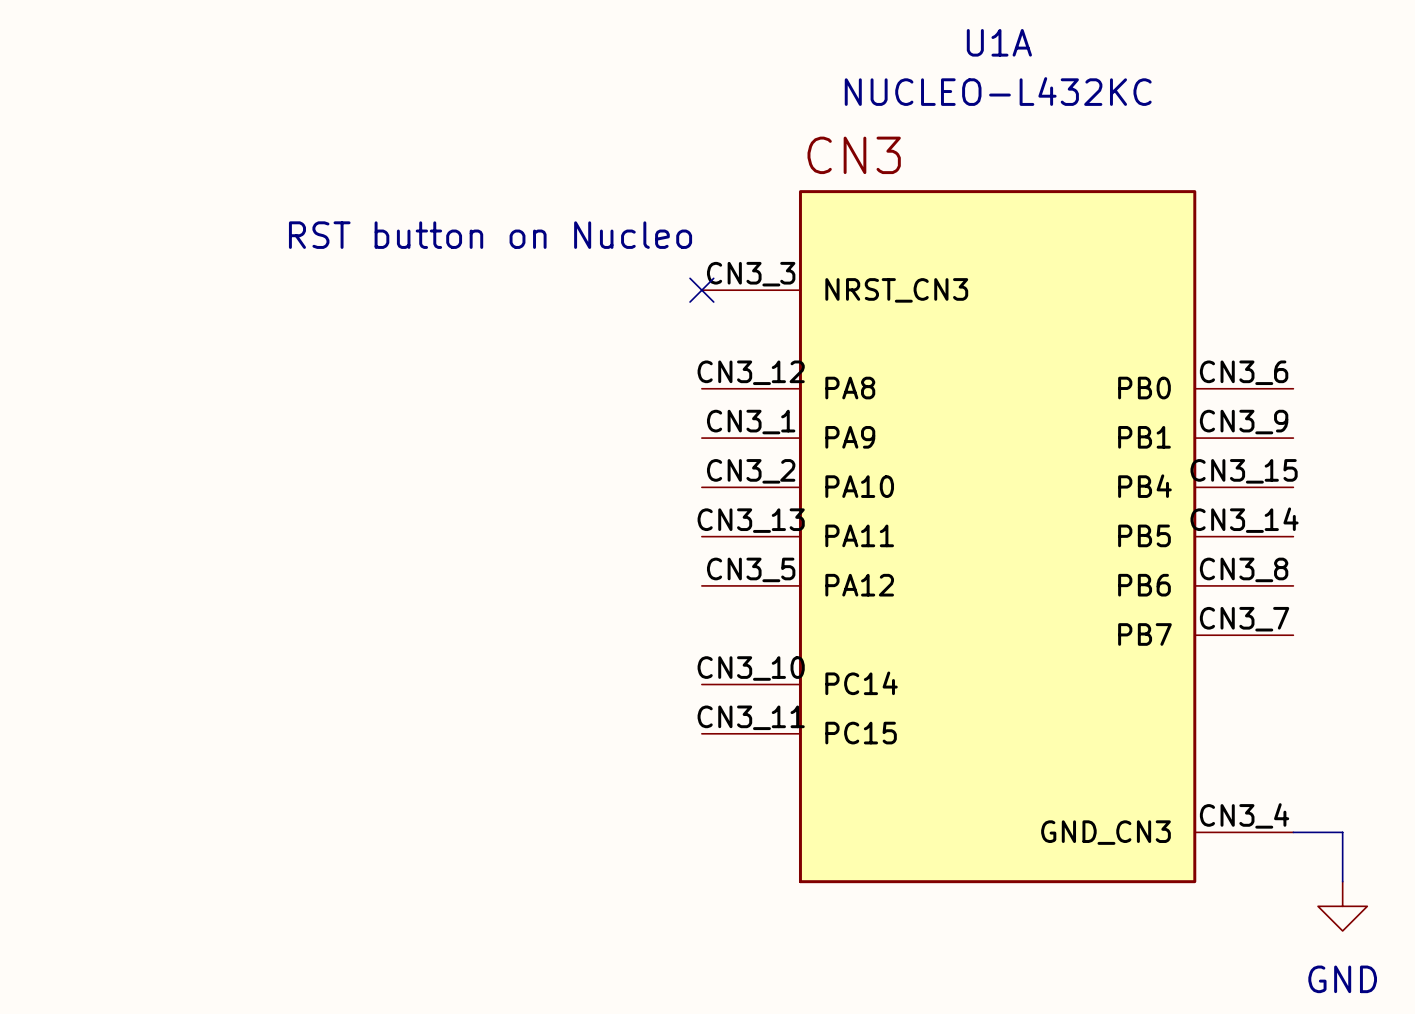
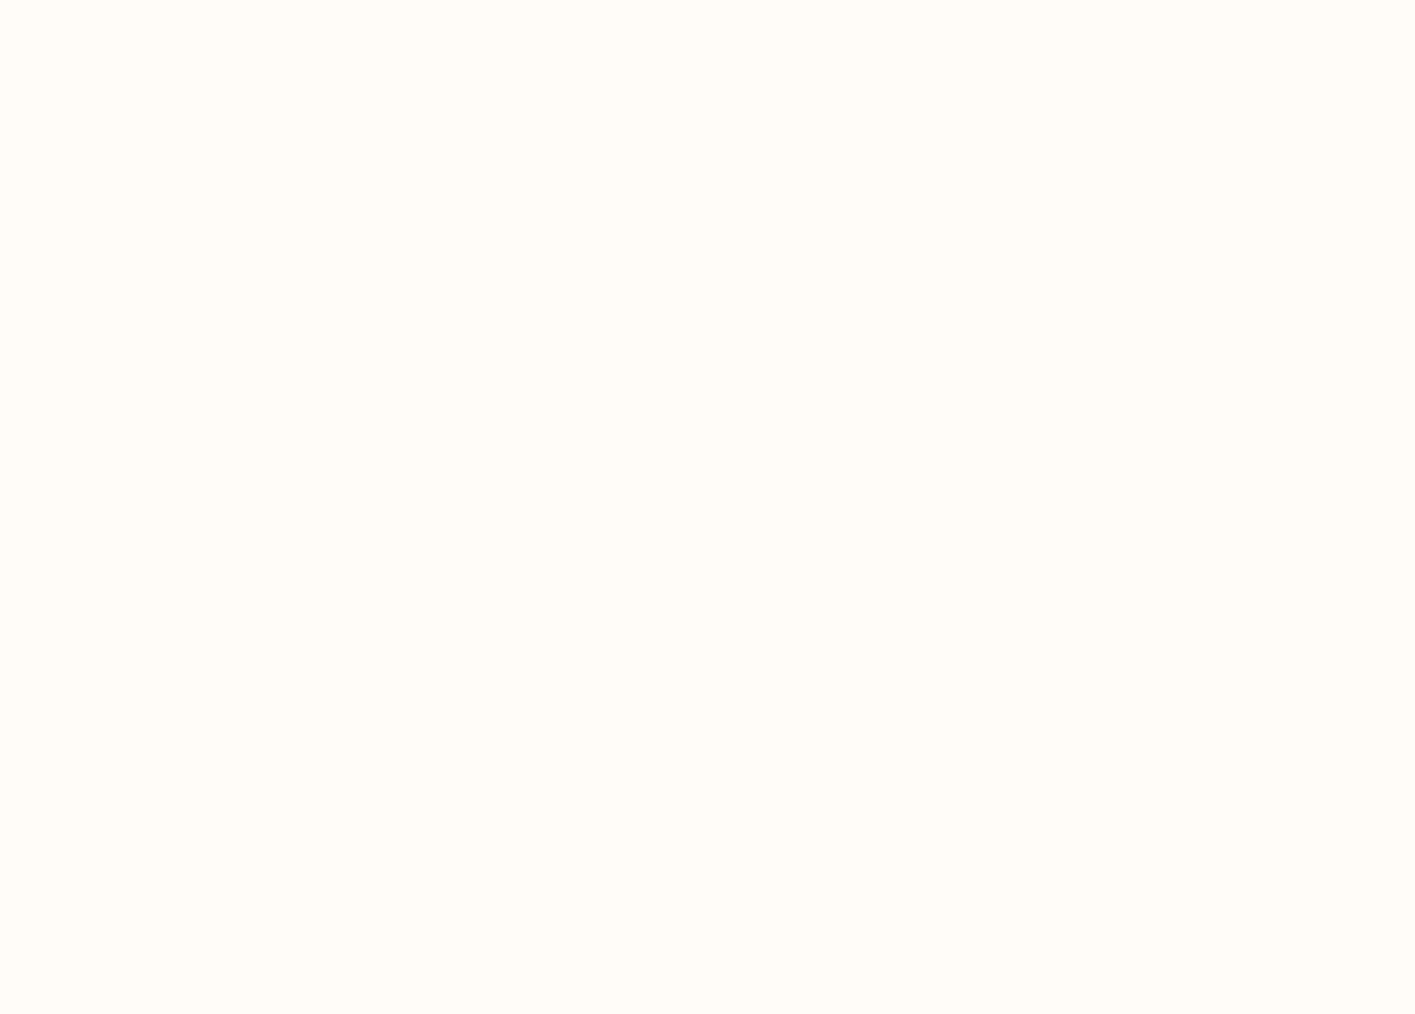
text: RST button on Nucleo (490, 235) -> none
no-connect mark: (701, 290) -> none
U1A: NUCLEO-L432KC (997, 536) -> none
wire: (1293, 832) (1342, 832) (1342, 881) -> none
power symbol: GND (1342, 906) -> none

